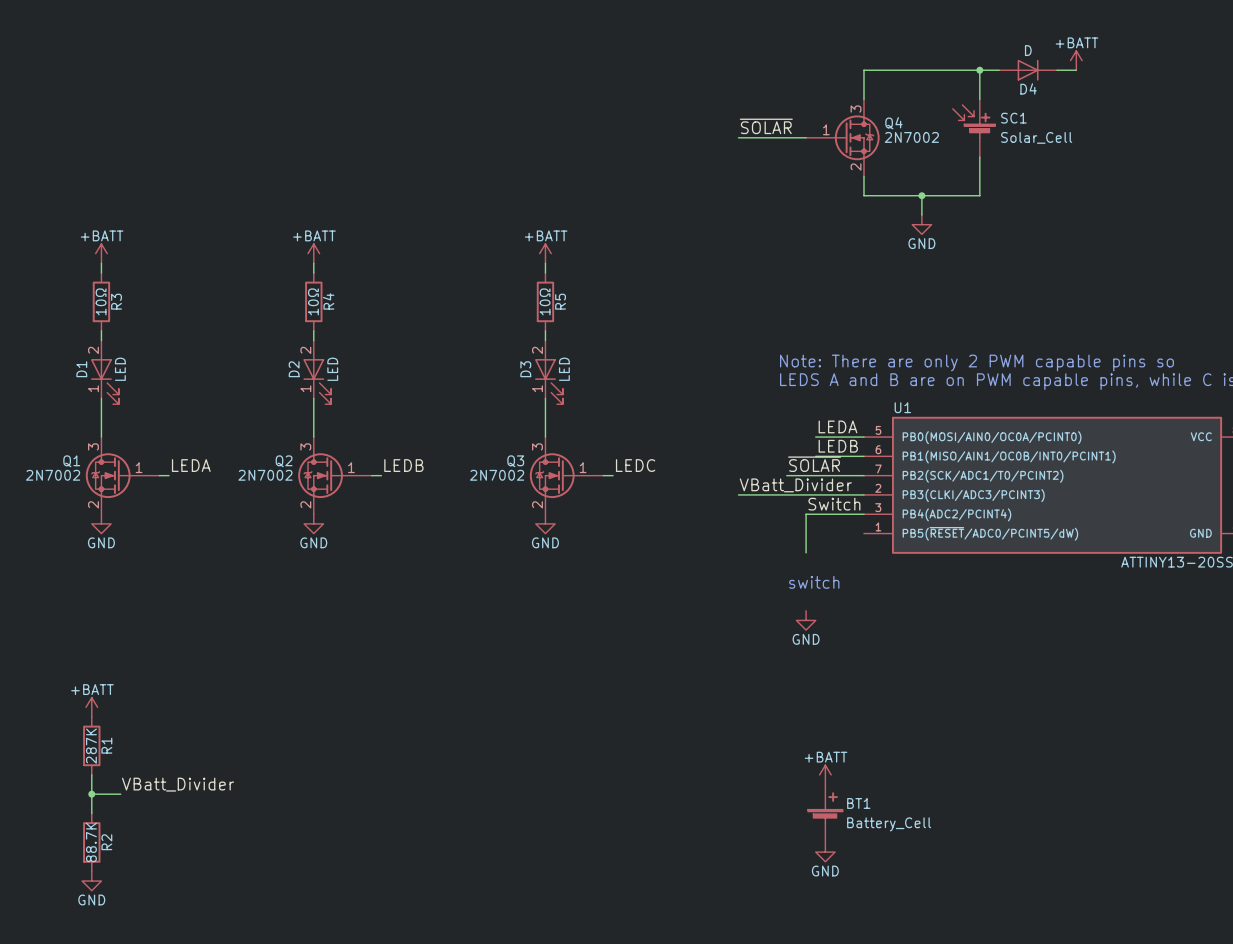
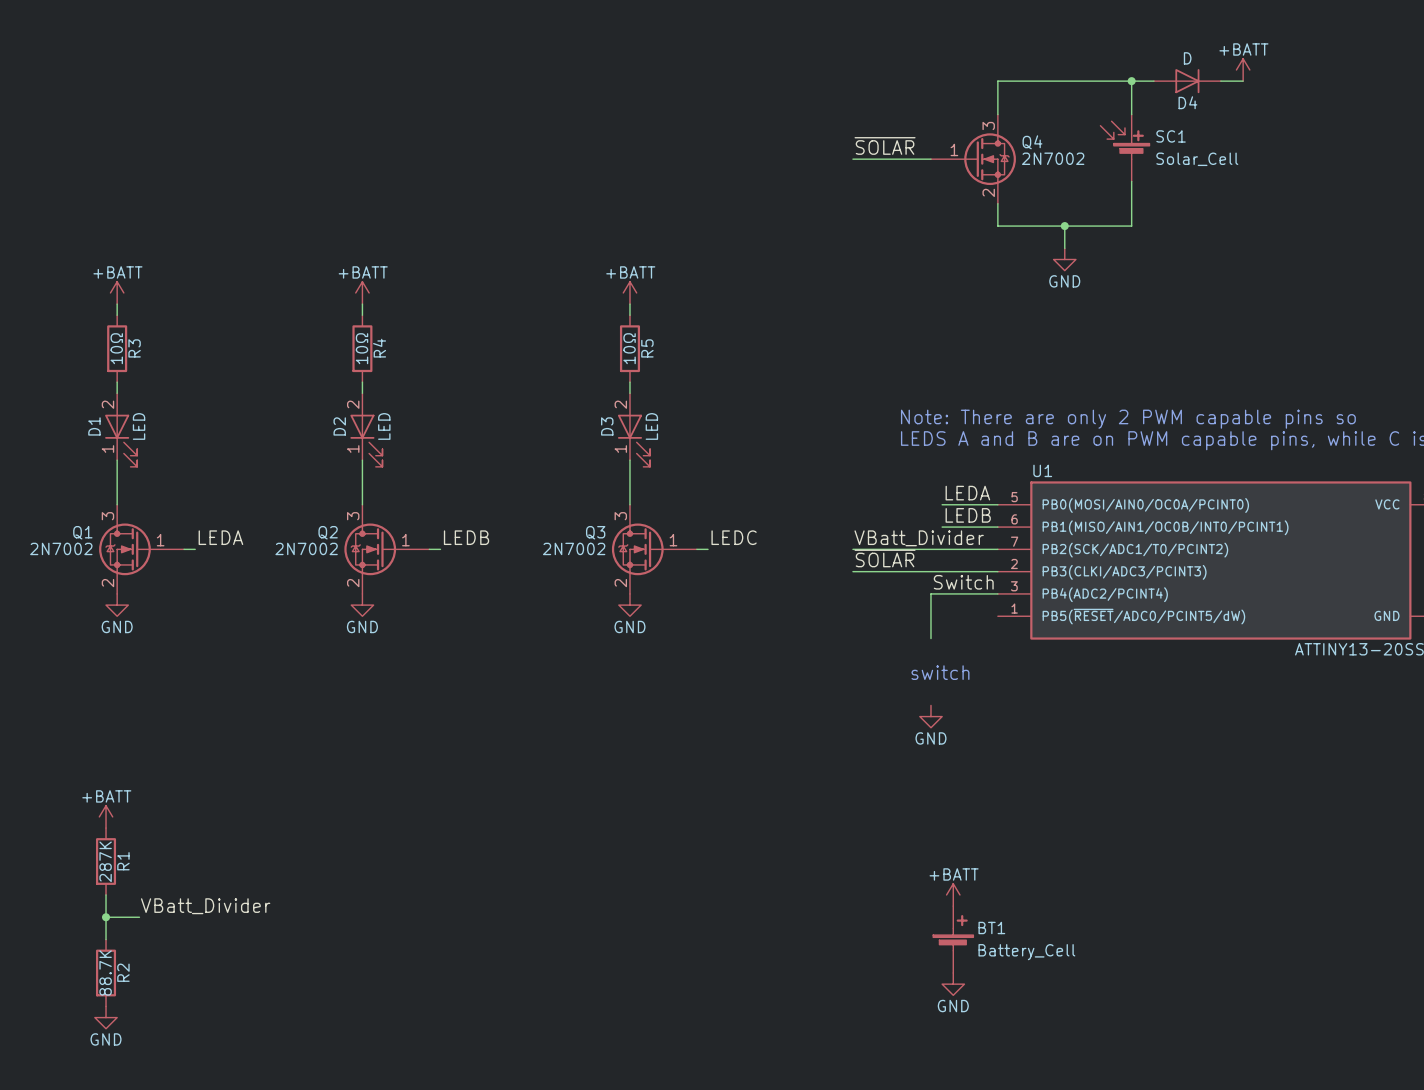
label: ~{SOLAR} (814, 464) -> none
label: none -> VBatt_Divider (919, 538)
wire: none -> (852, 549) (908, 549)
label: VBatt_Divider (795, 485) -> ~{SOLAR} (885, 558)

